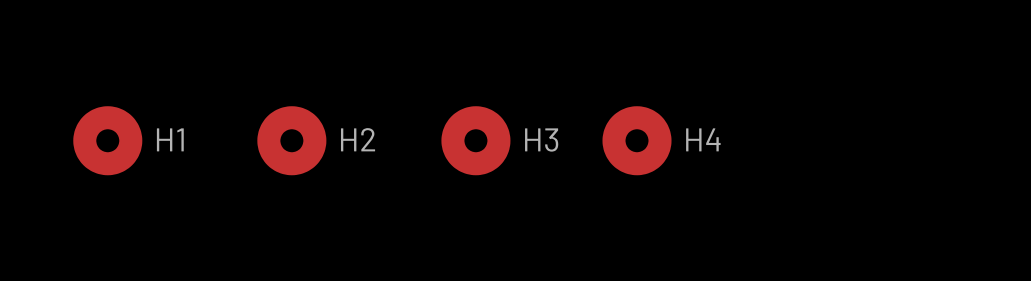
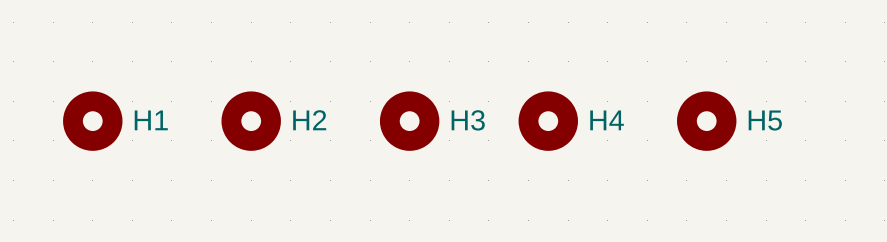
H5: none -> (706, 121)

